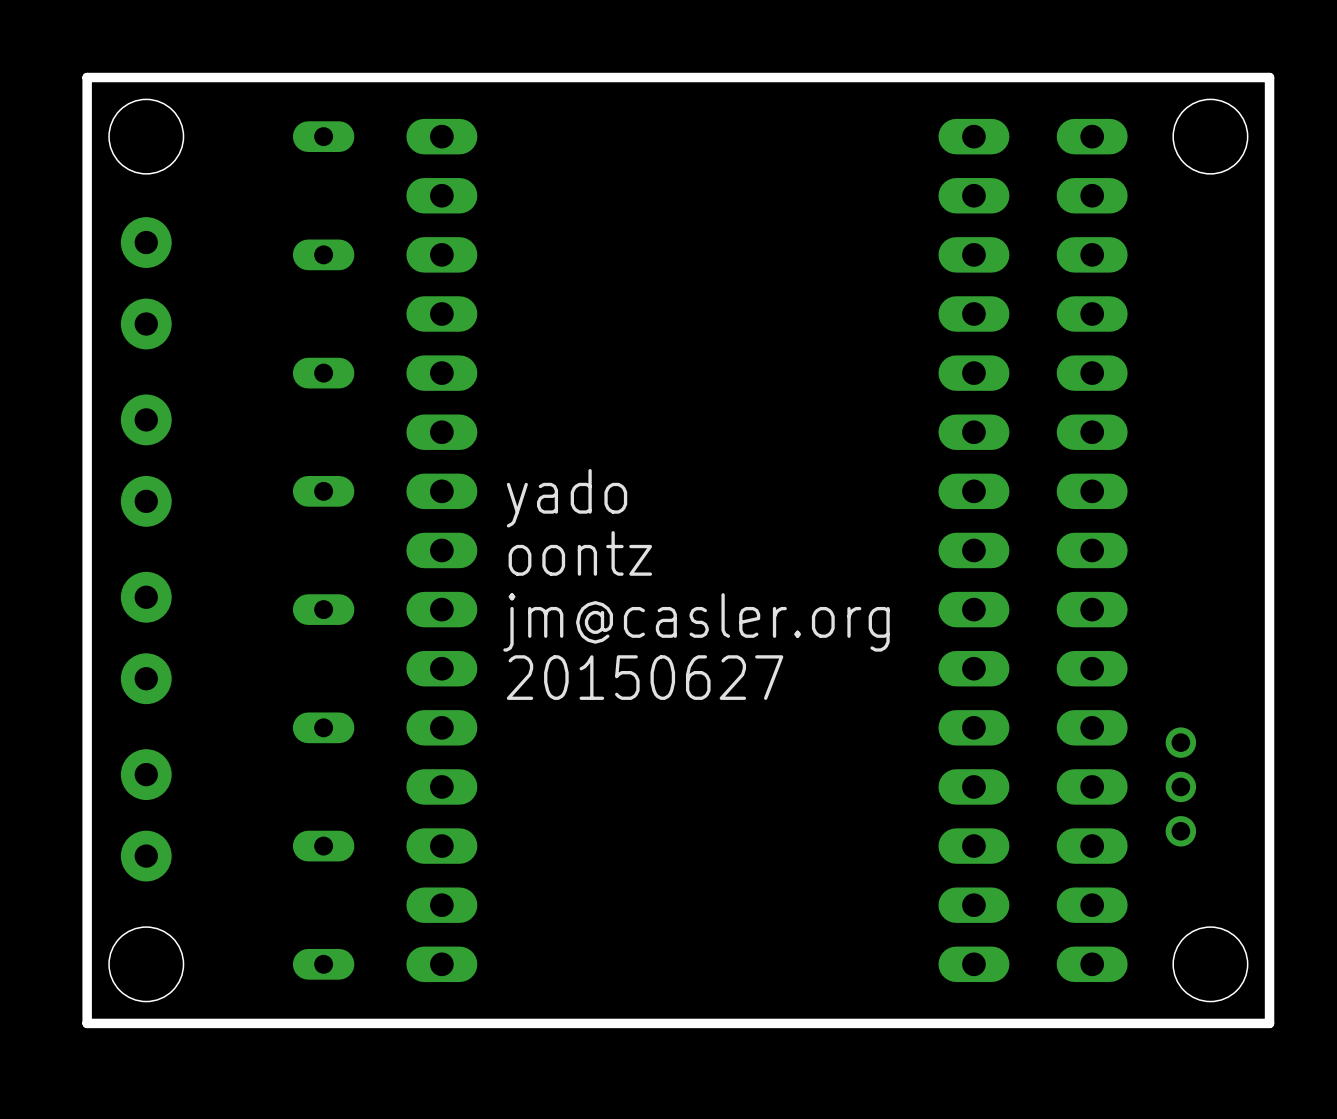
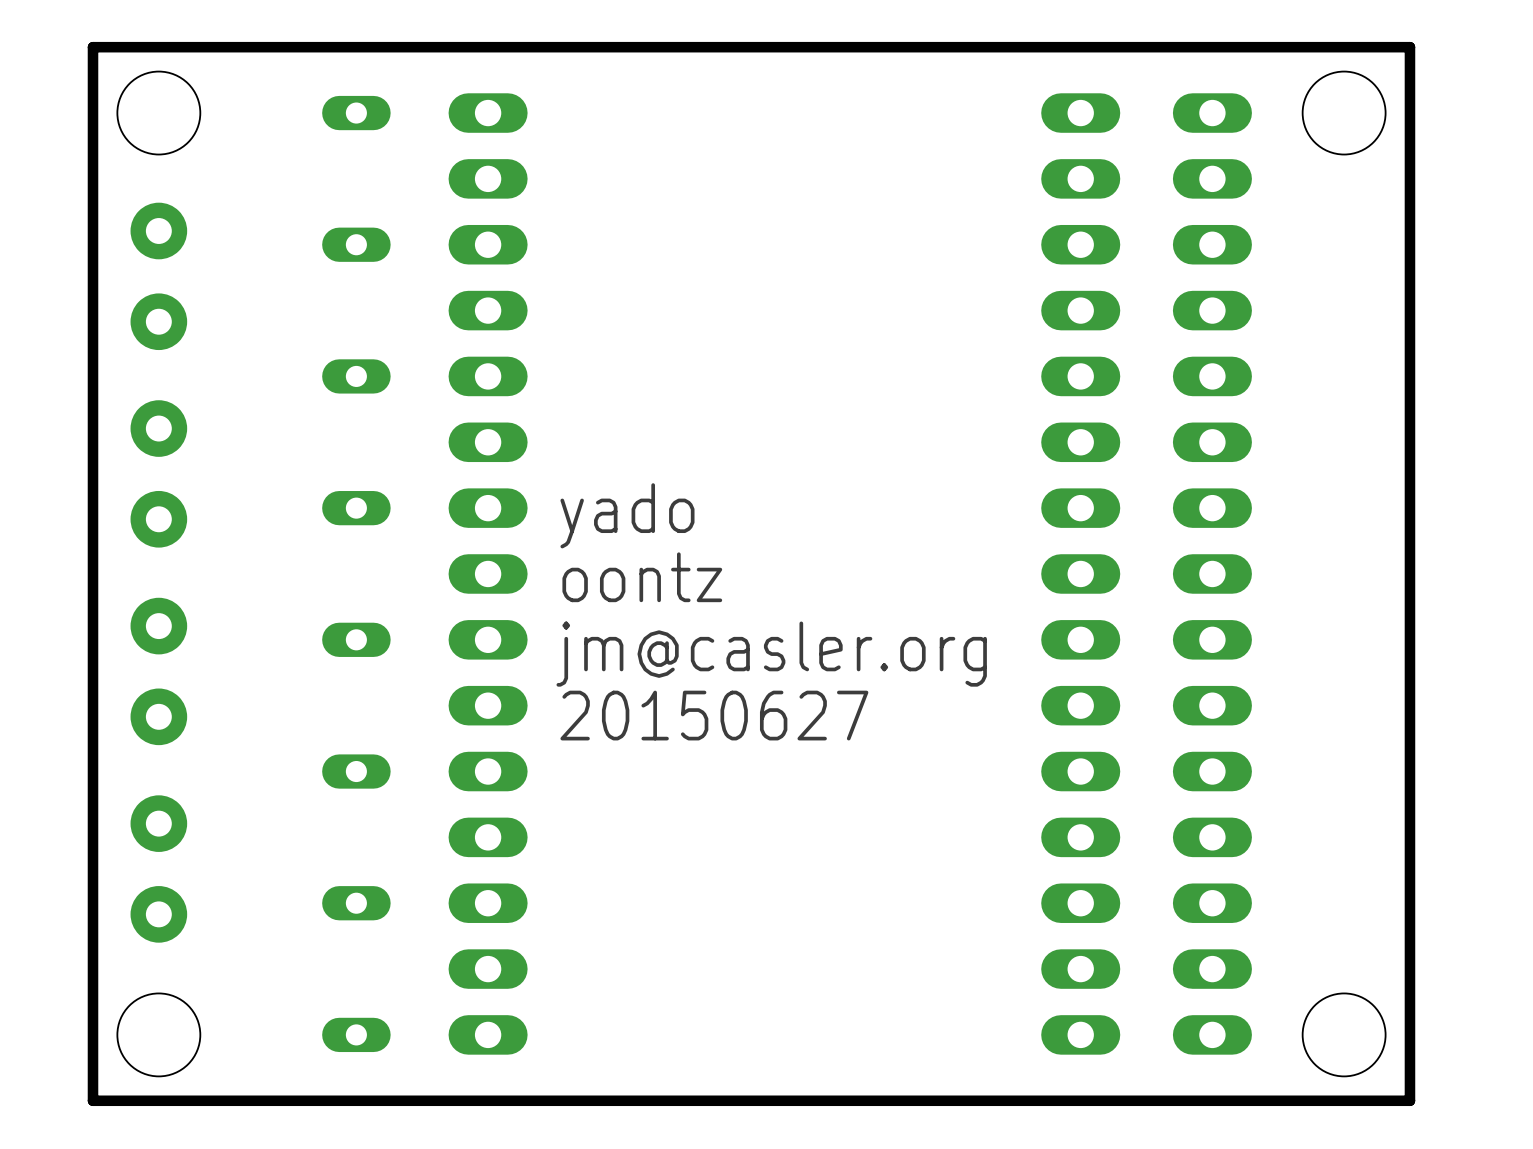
part: (1180, 786) -> none

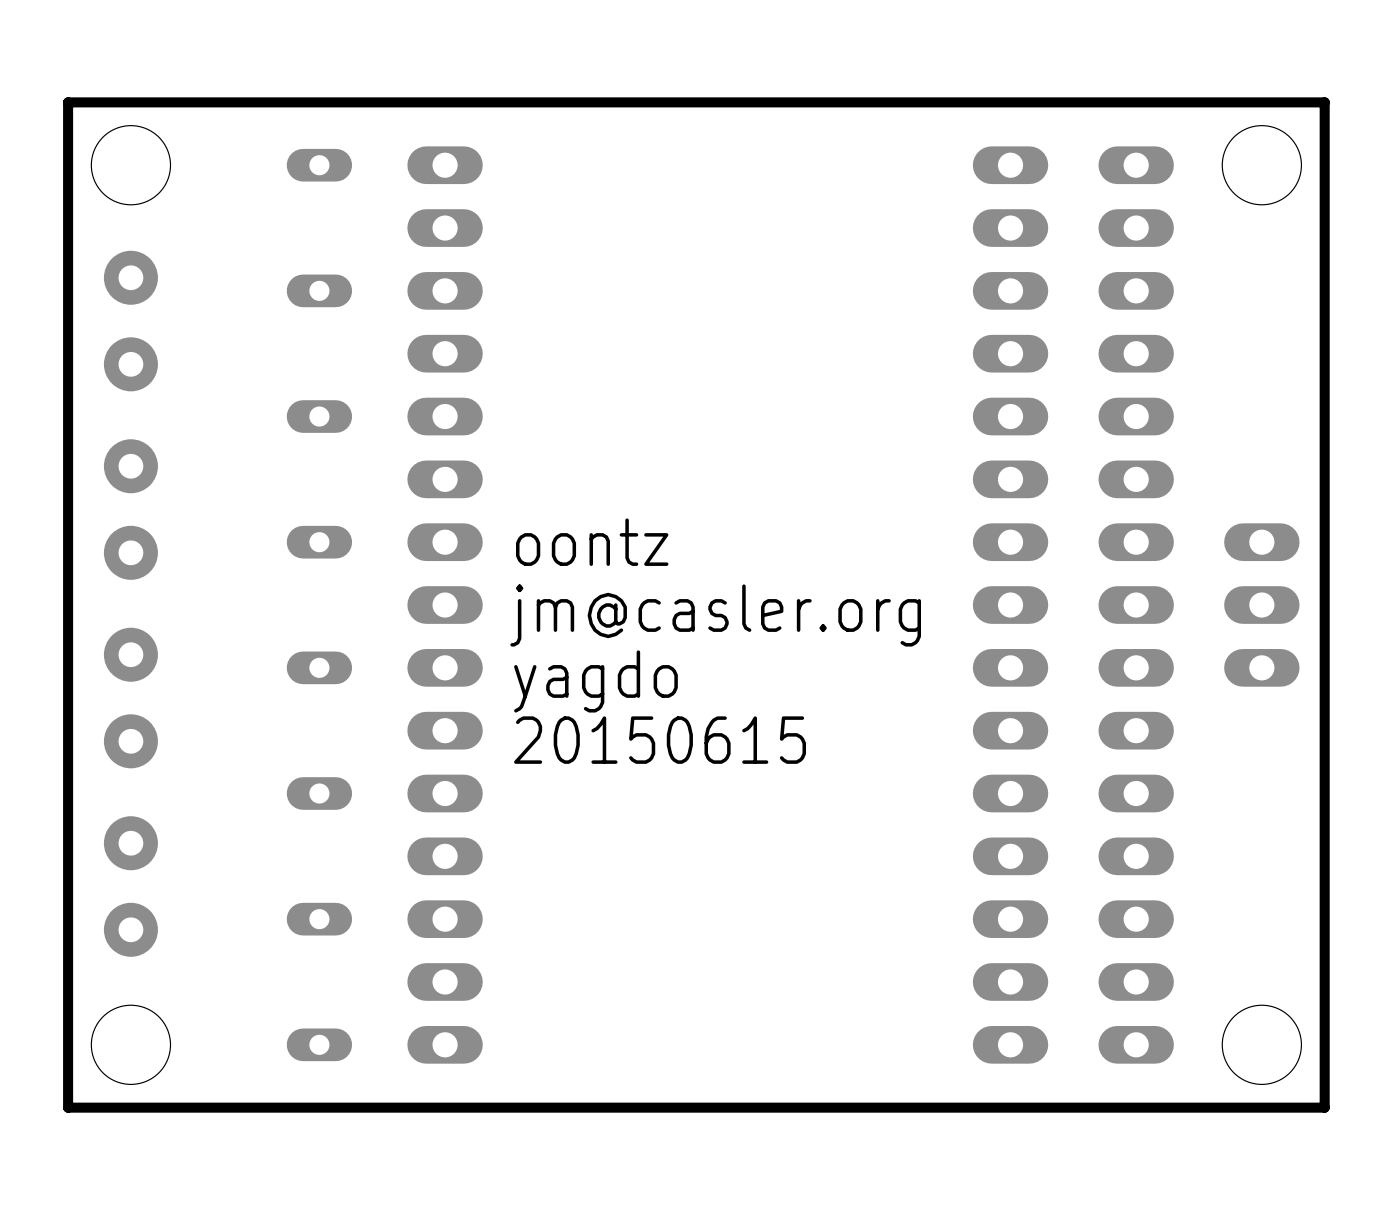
text: yado (627, 515) -> oontz (592, 542)
part: none -> (1261, 605)
text: oontz (642, 577) -> jm@casler.org (715, 615)
text: jm@casler.org (771, 654) -> yagdo (595, 681)
text: 20150627 (714, 715) -> 20150615 (660, 740)

